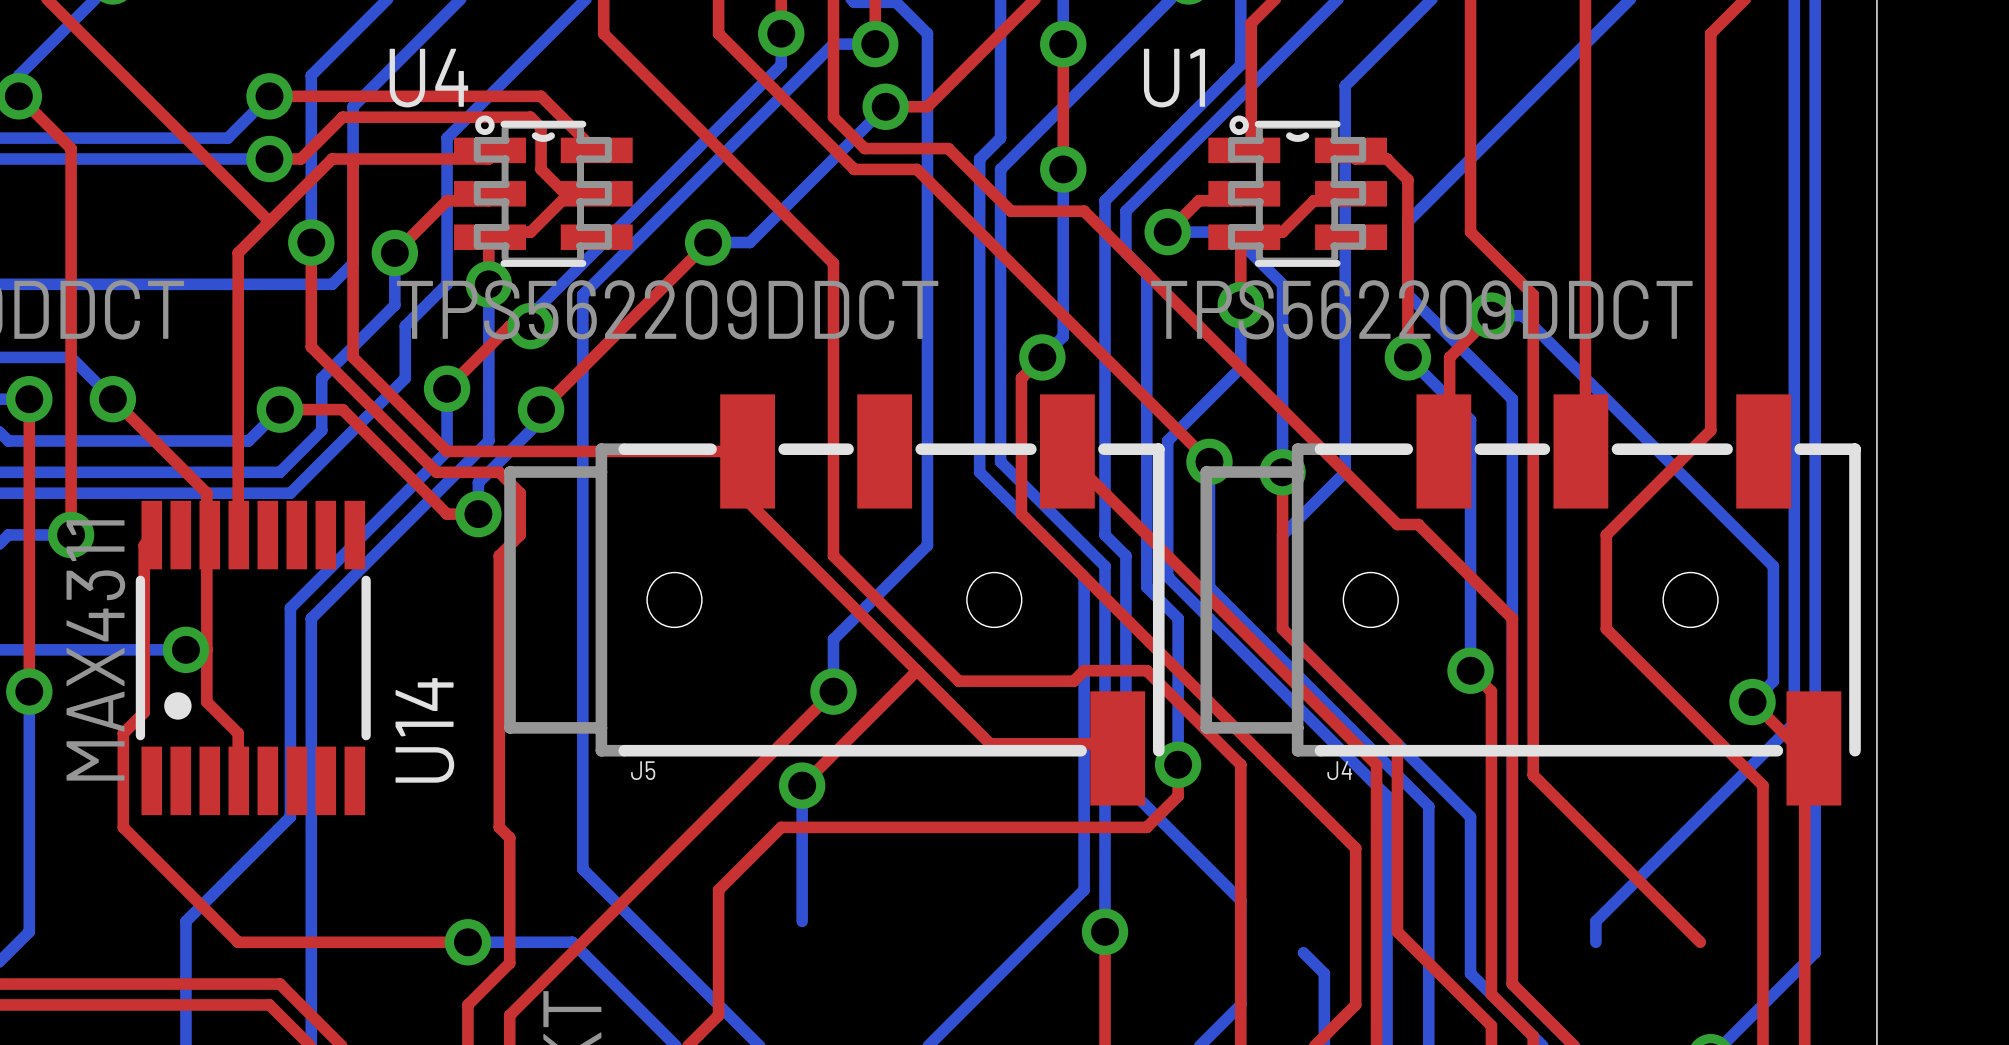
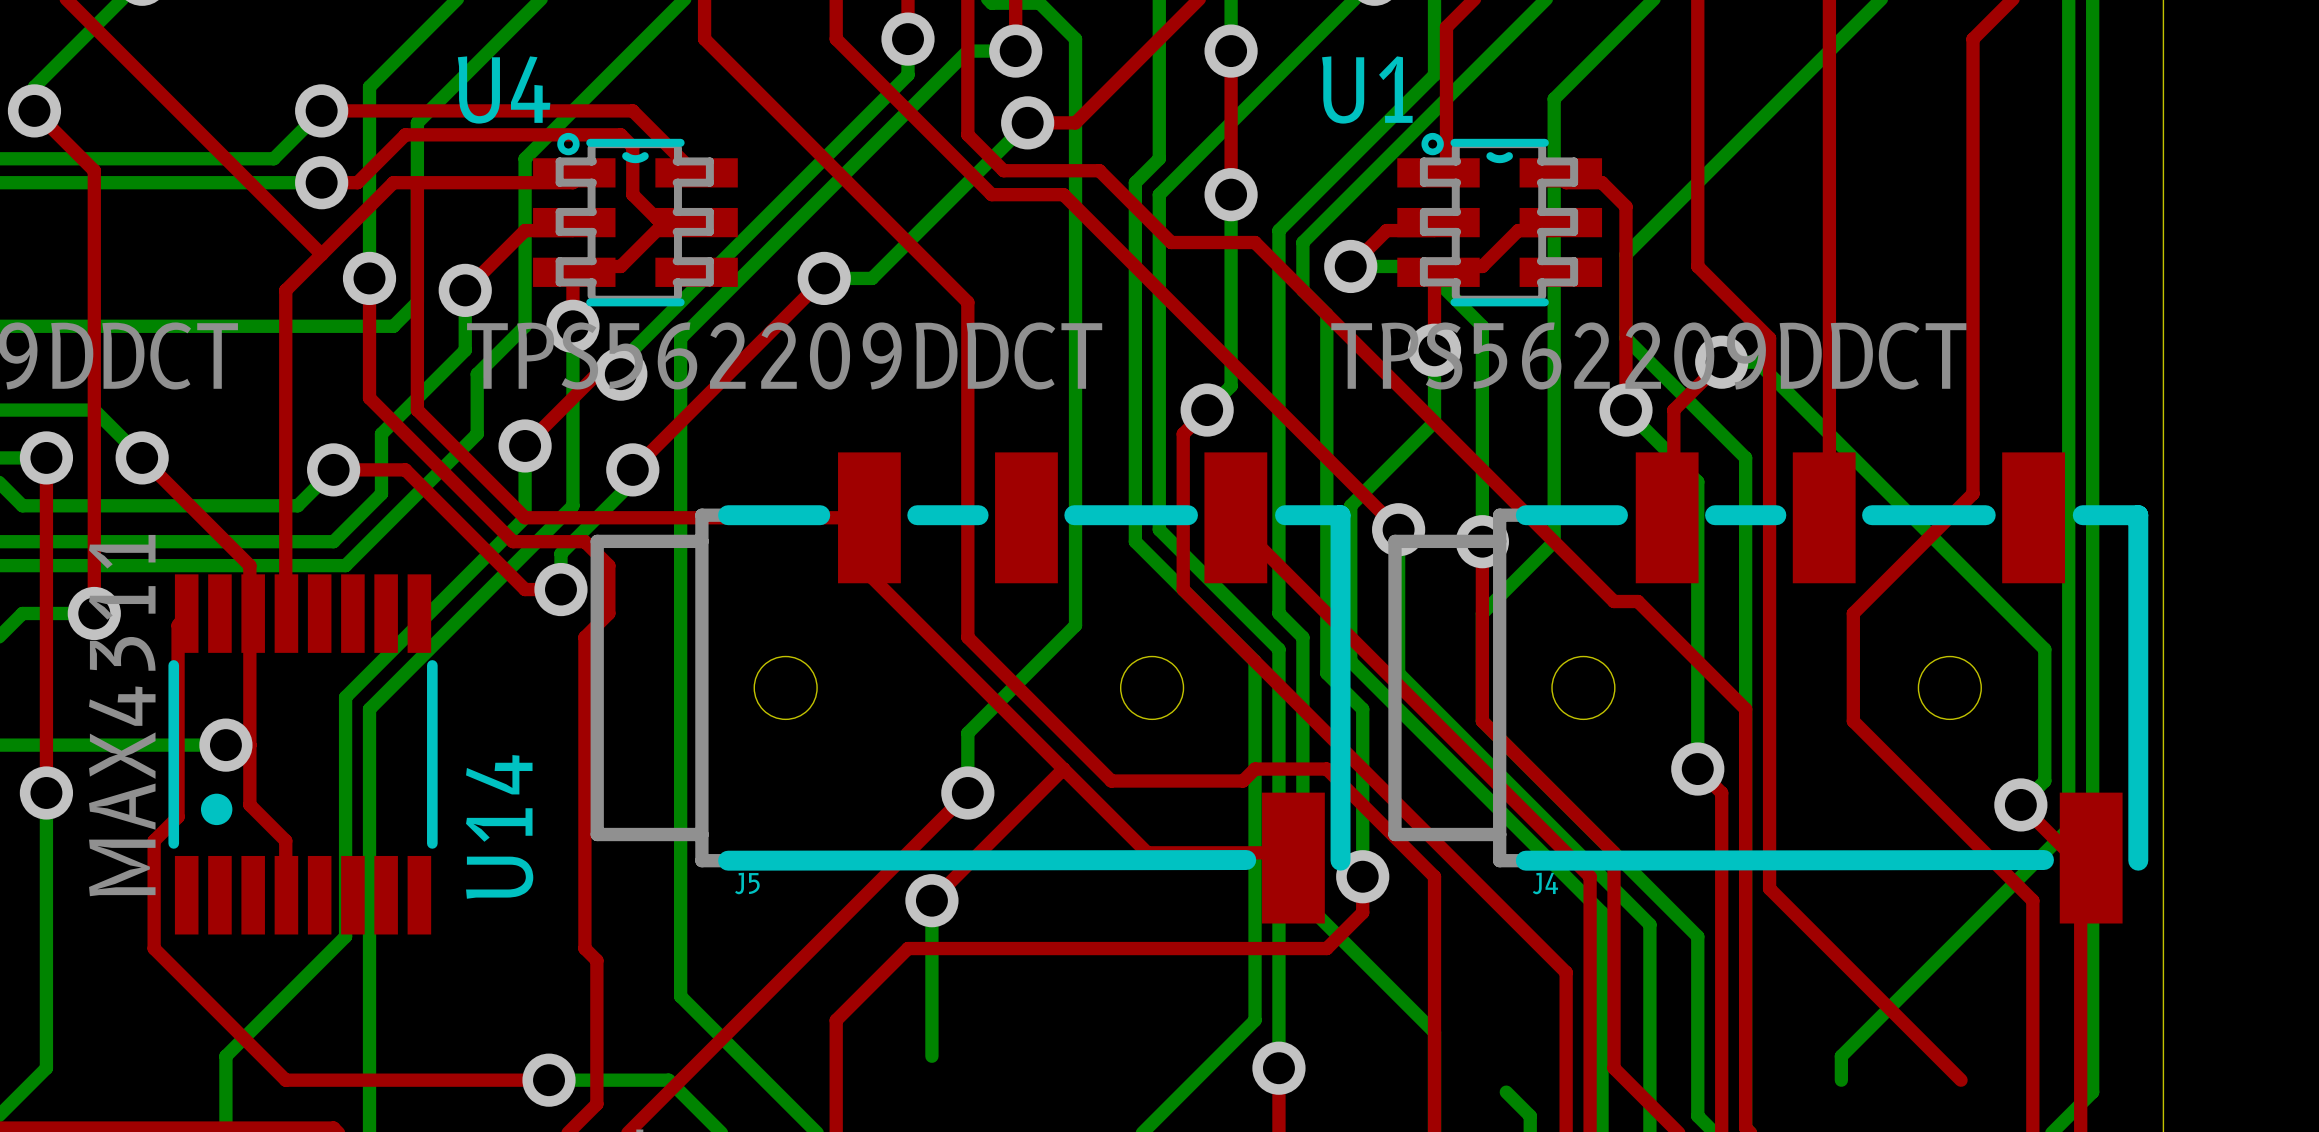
J5 footprint: [504, 394, 1165, 806] -> [590, 452, 1351, 924]
J4 footprint: [1200, 394, 1861, 806] -> [1388, 452, 2149, 924]

